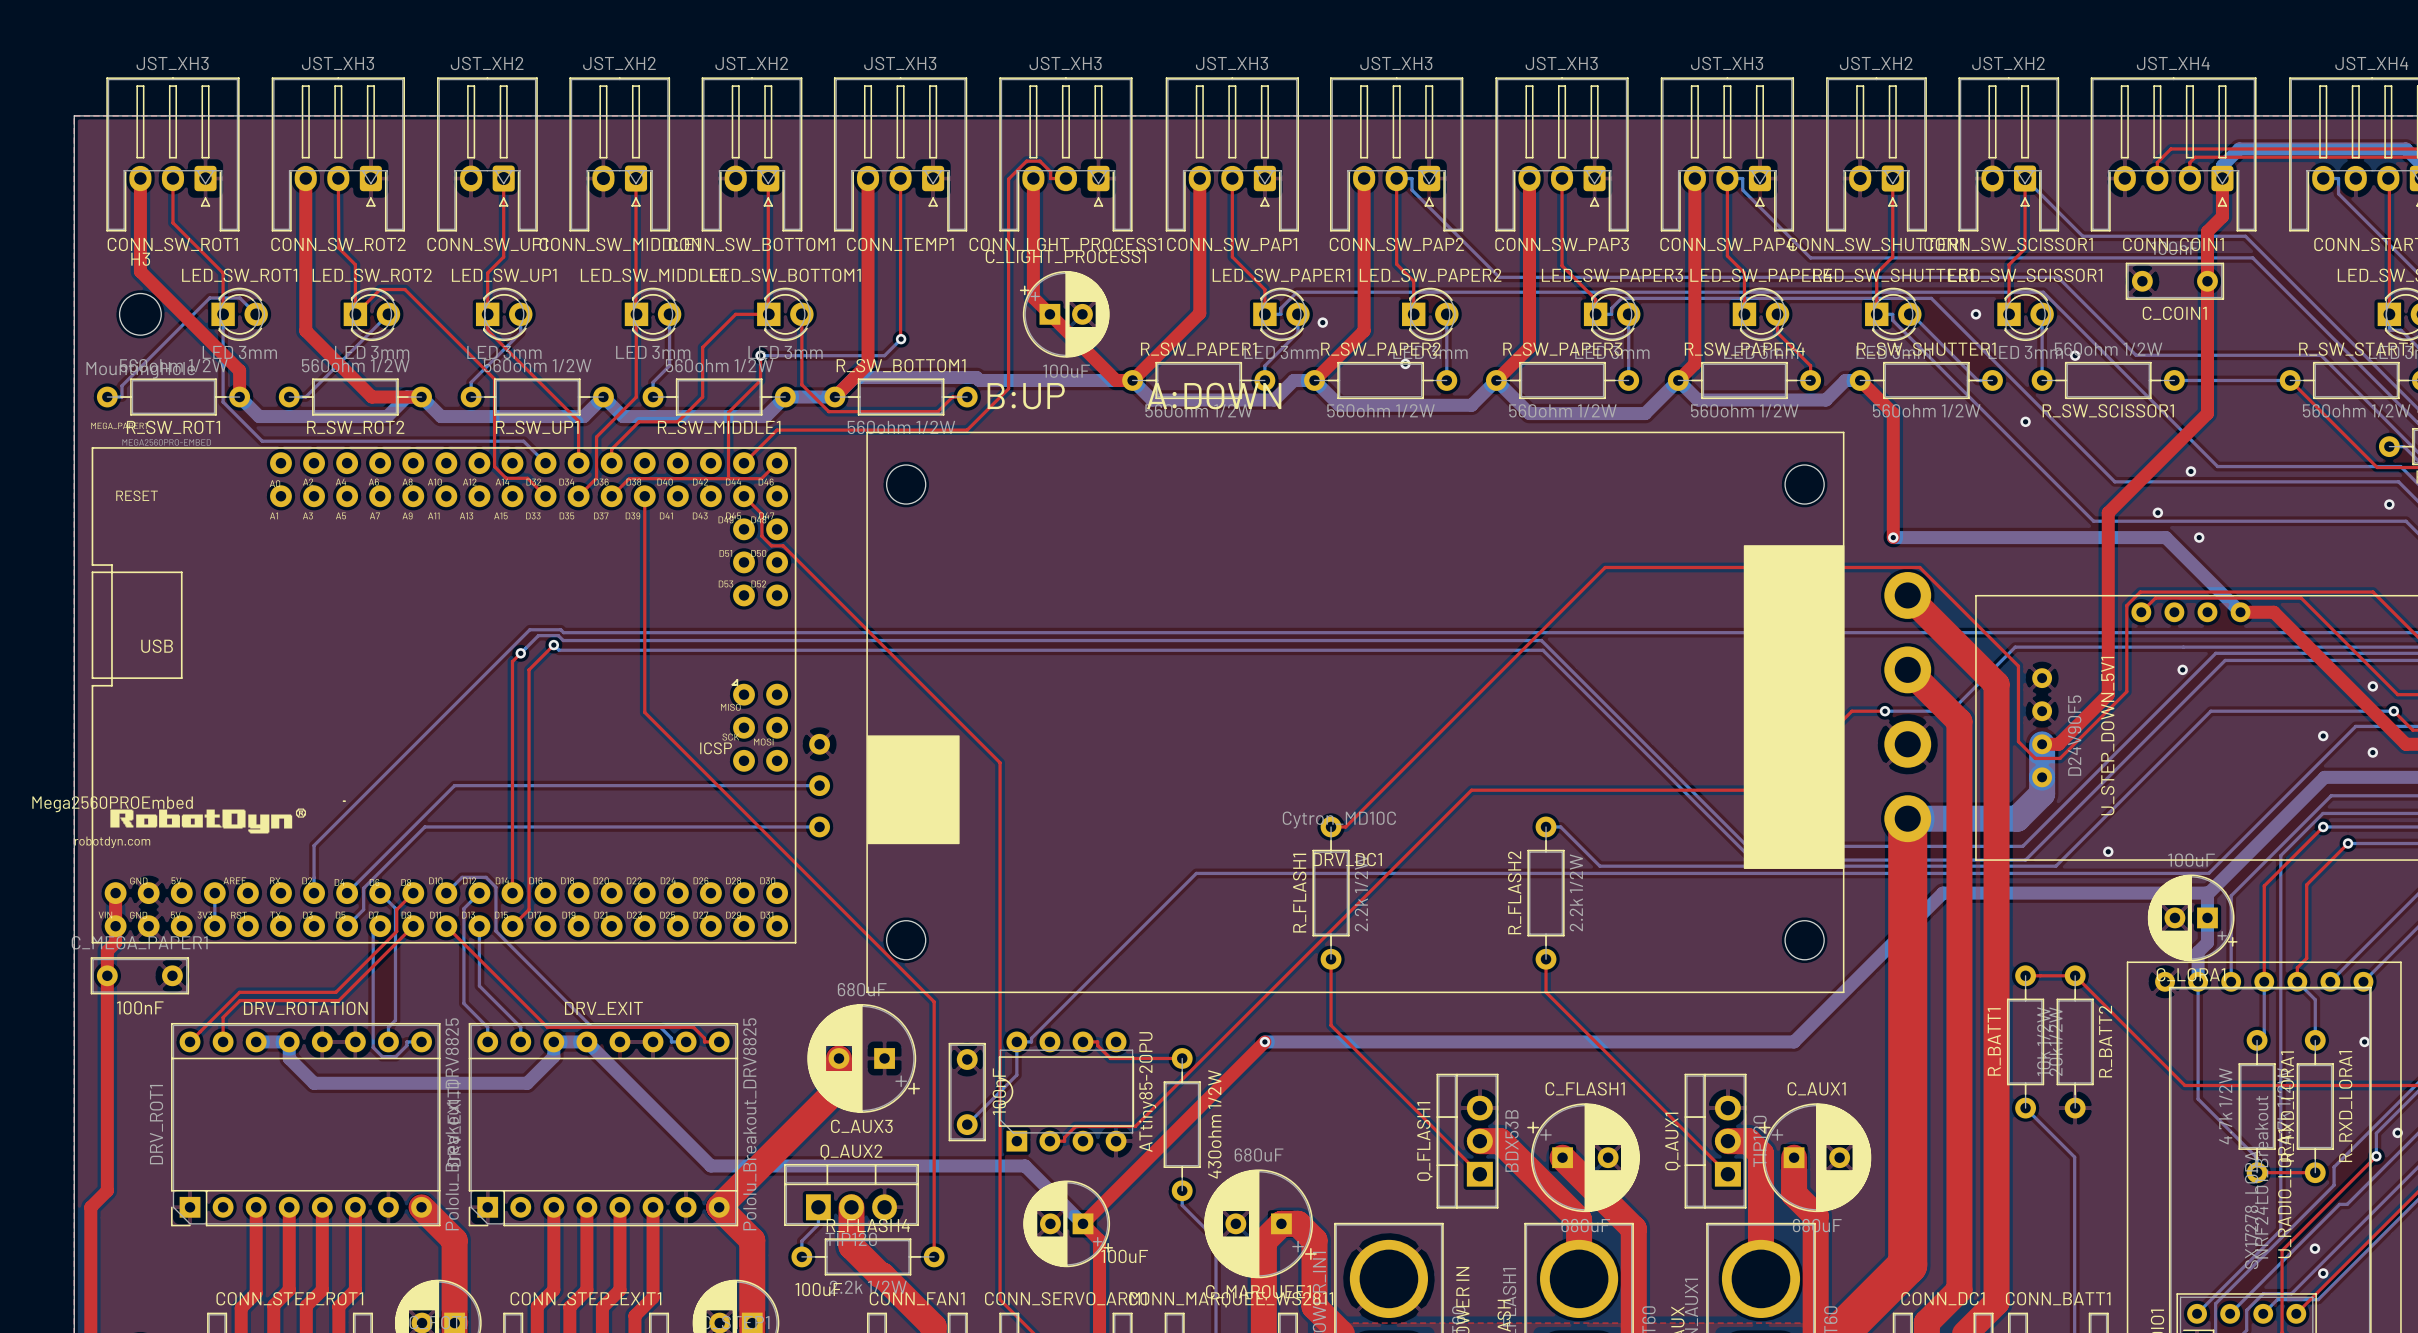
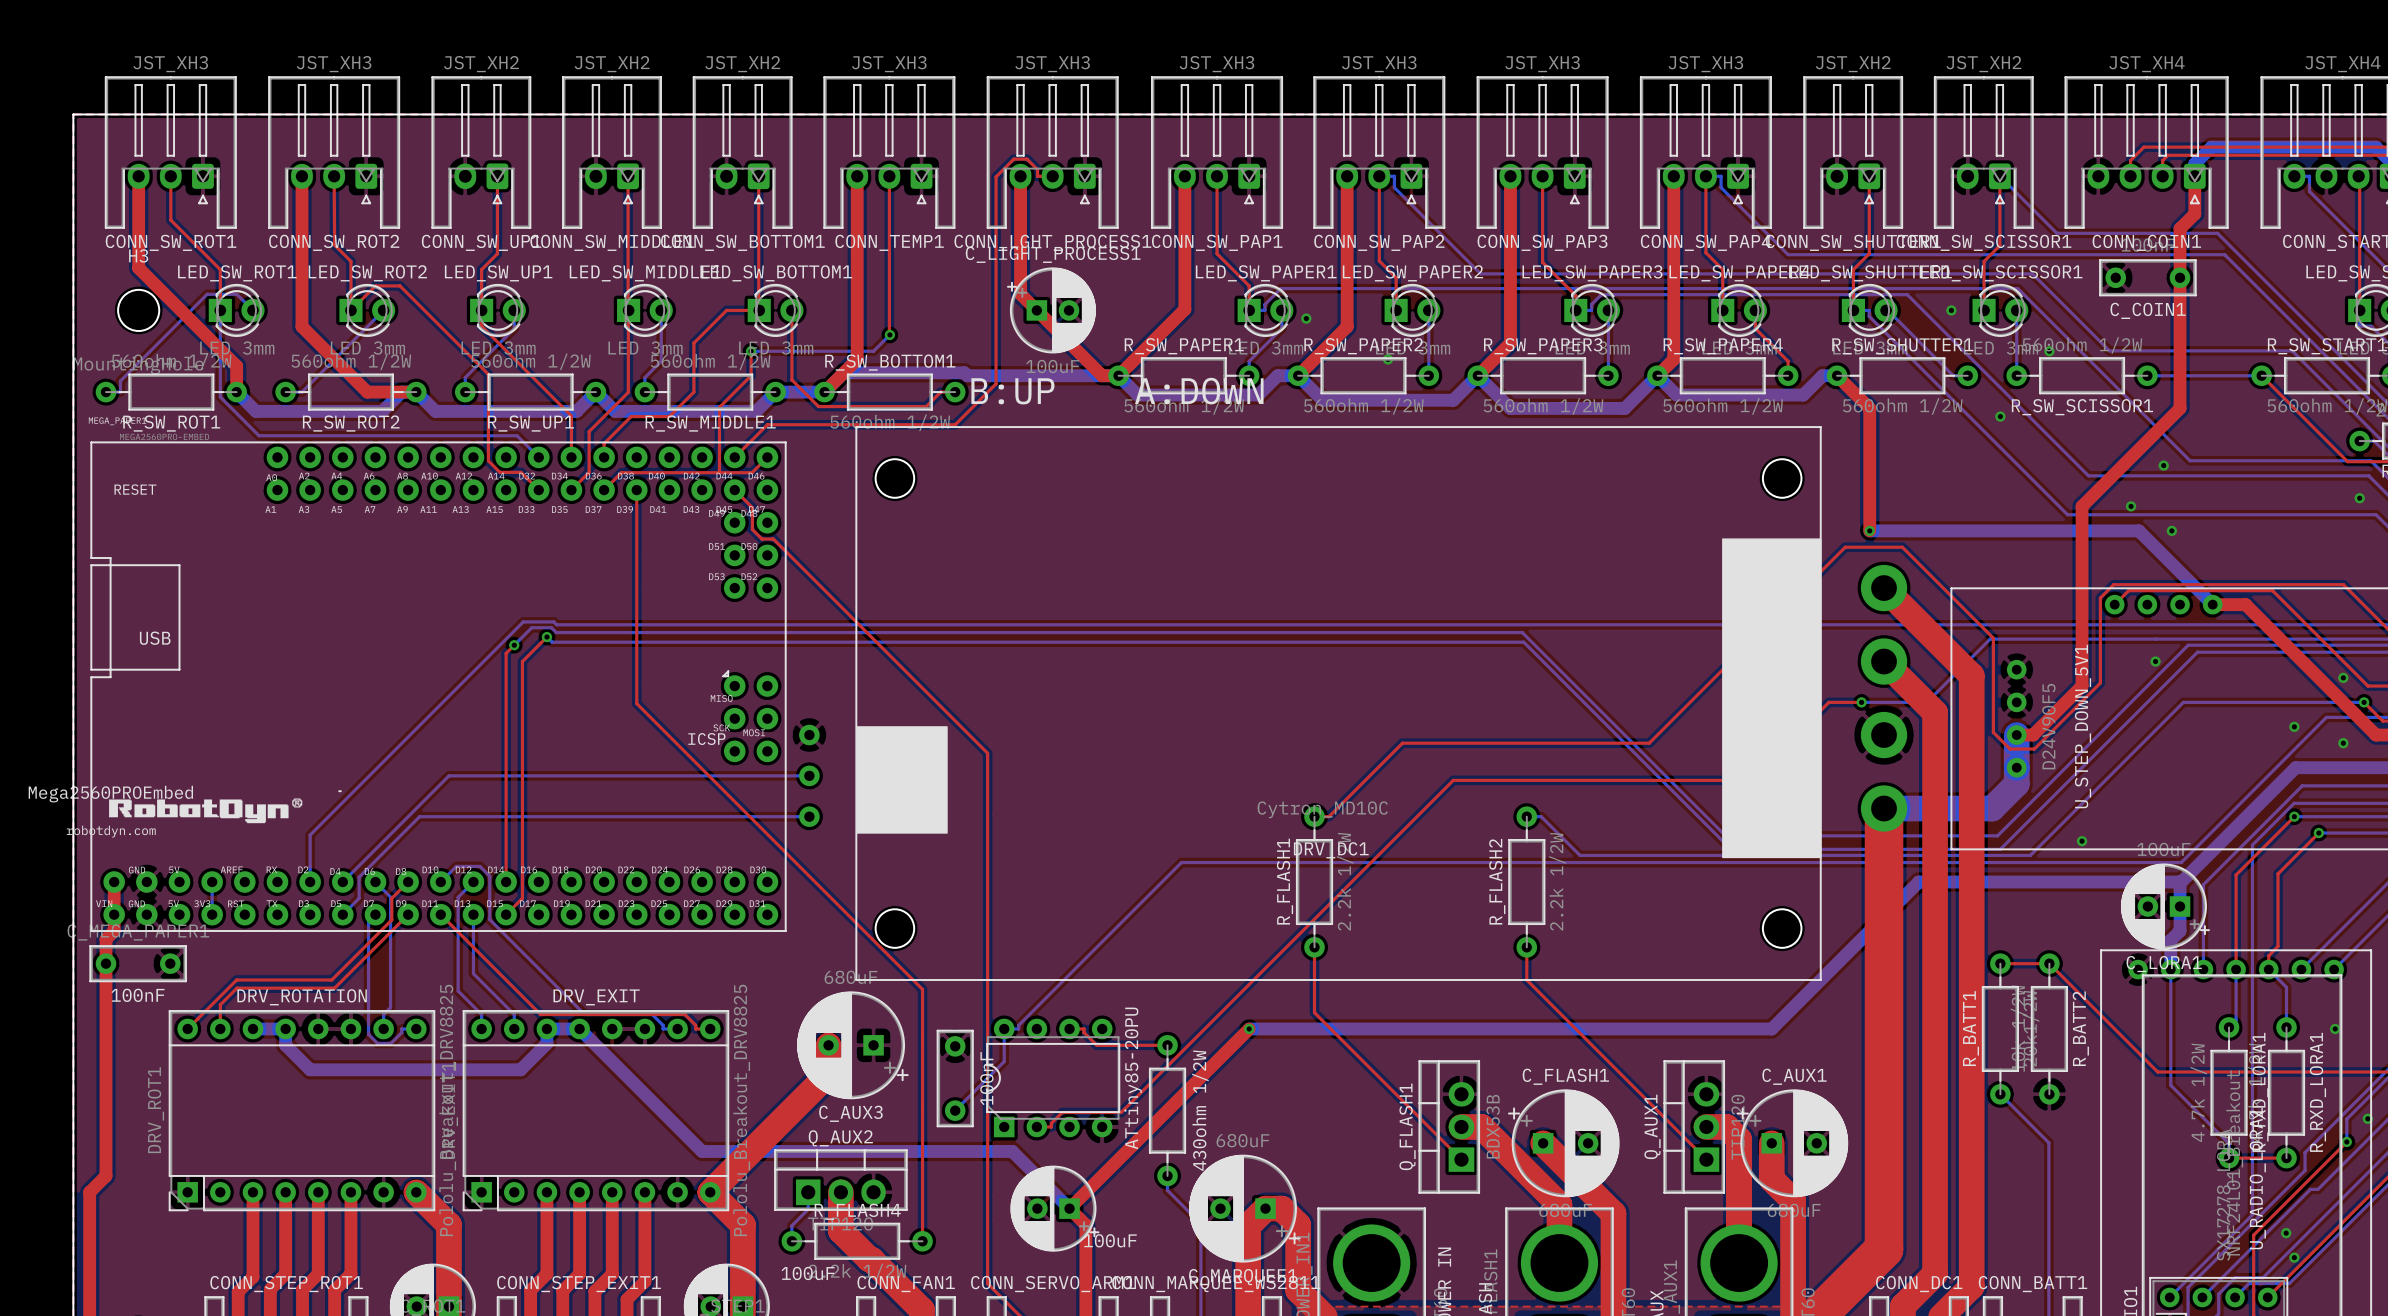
top track: (2018, 666) (1919, 567) (1605, 567) (1420, 752) -> (1993, 657) (1993, 638) (1902, 547) (1845, 547) (1649, 743) (1402, 743)

